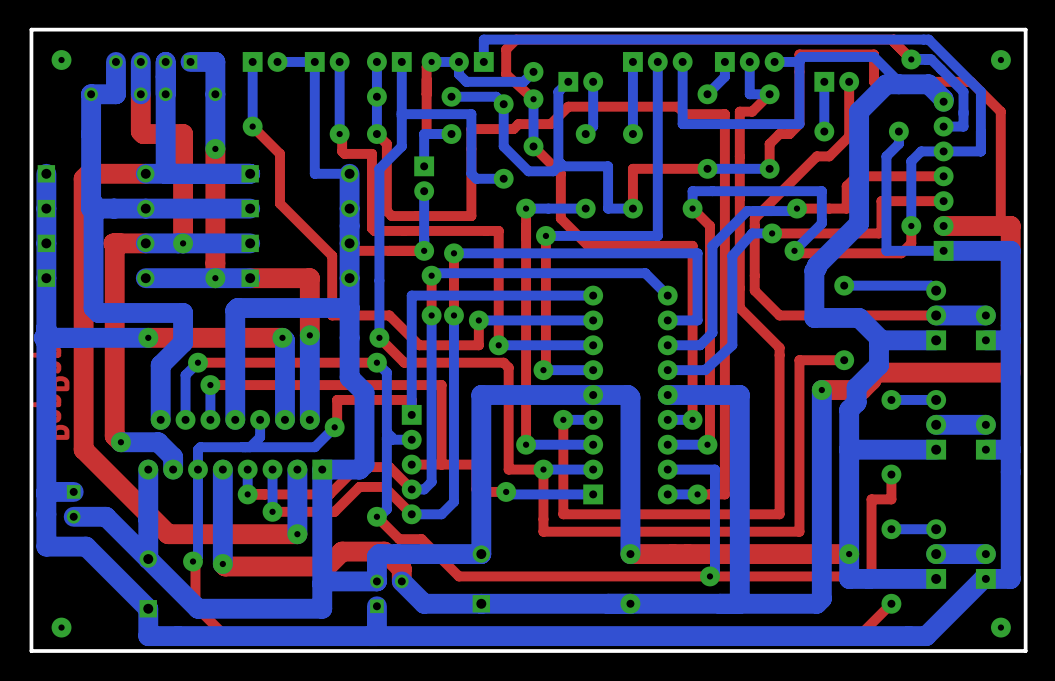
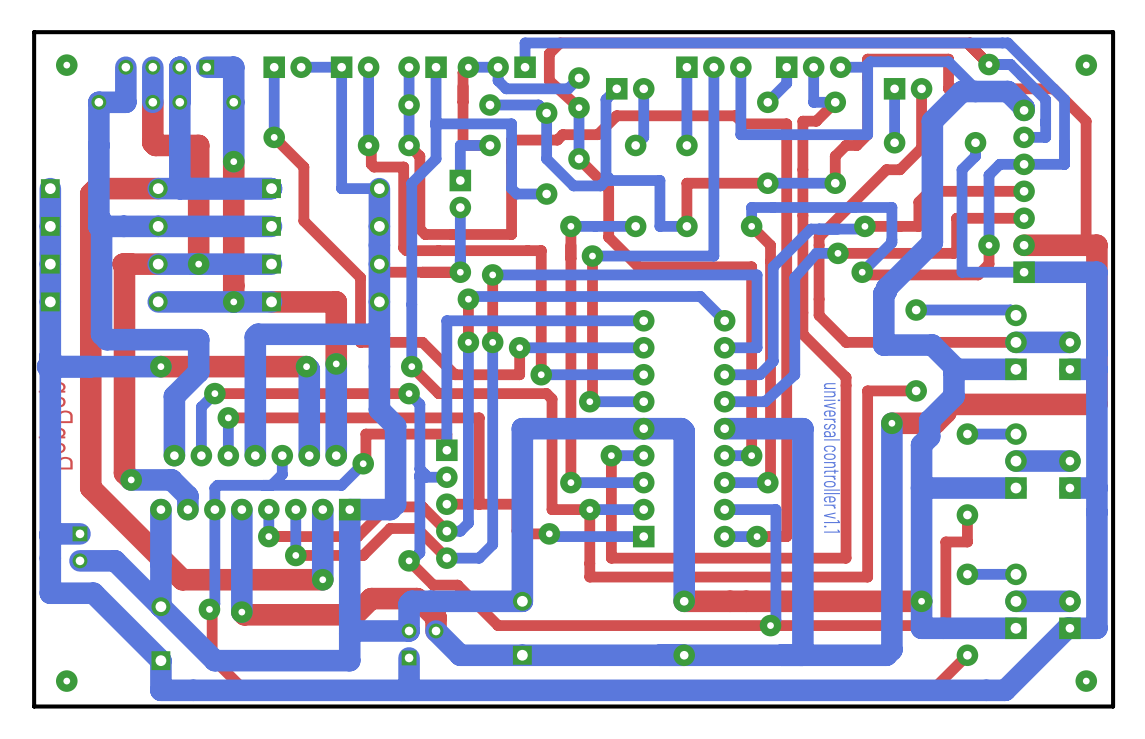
text: none -> universal controller v1.1 (832, 457)

